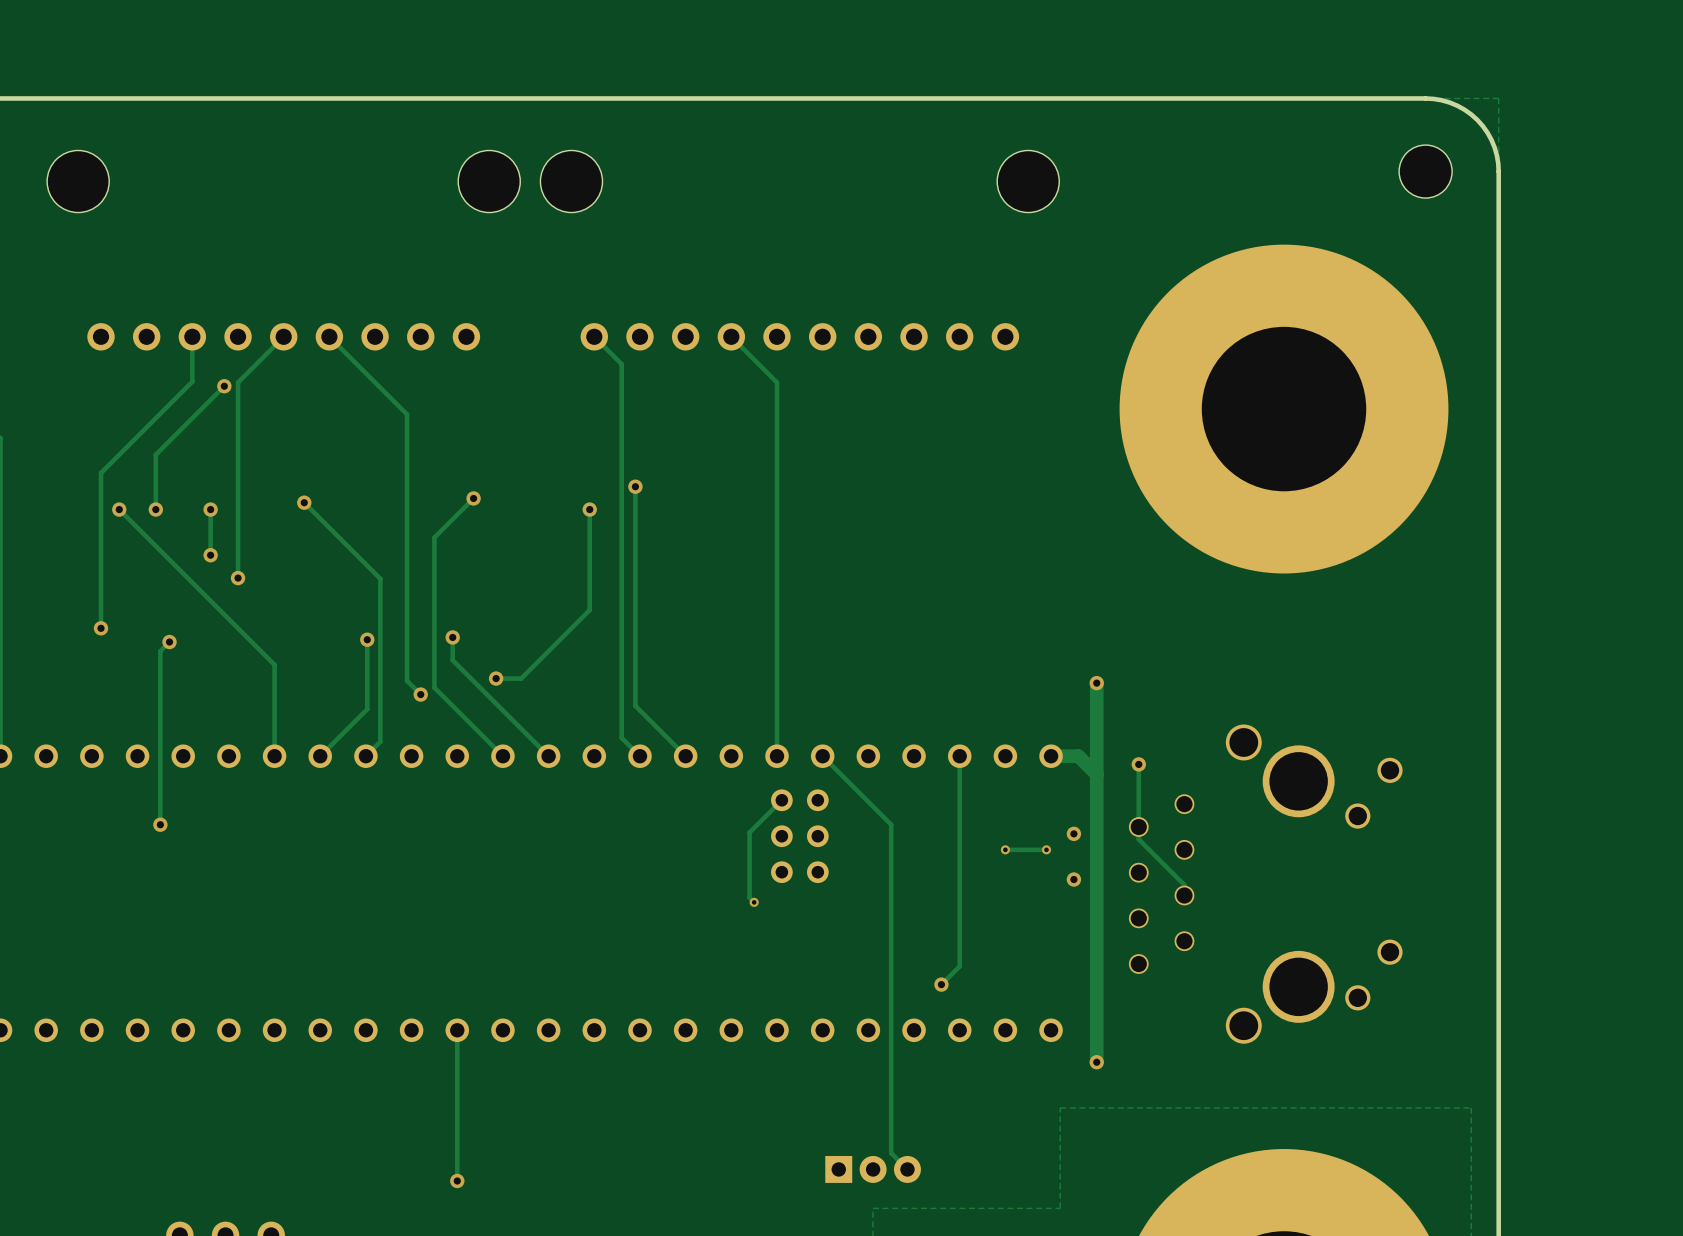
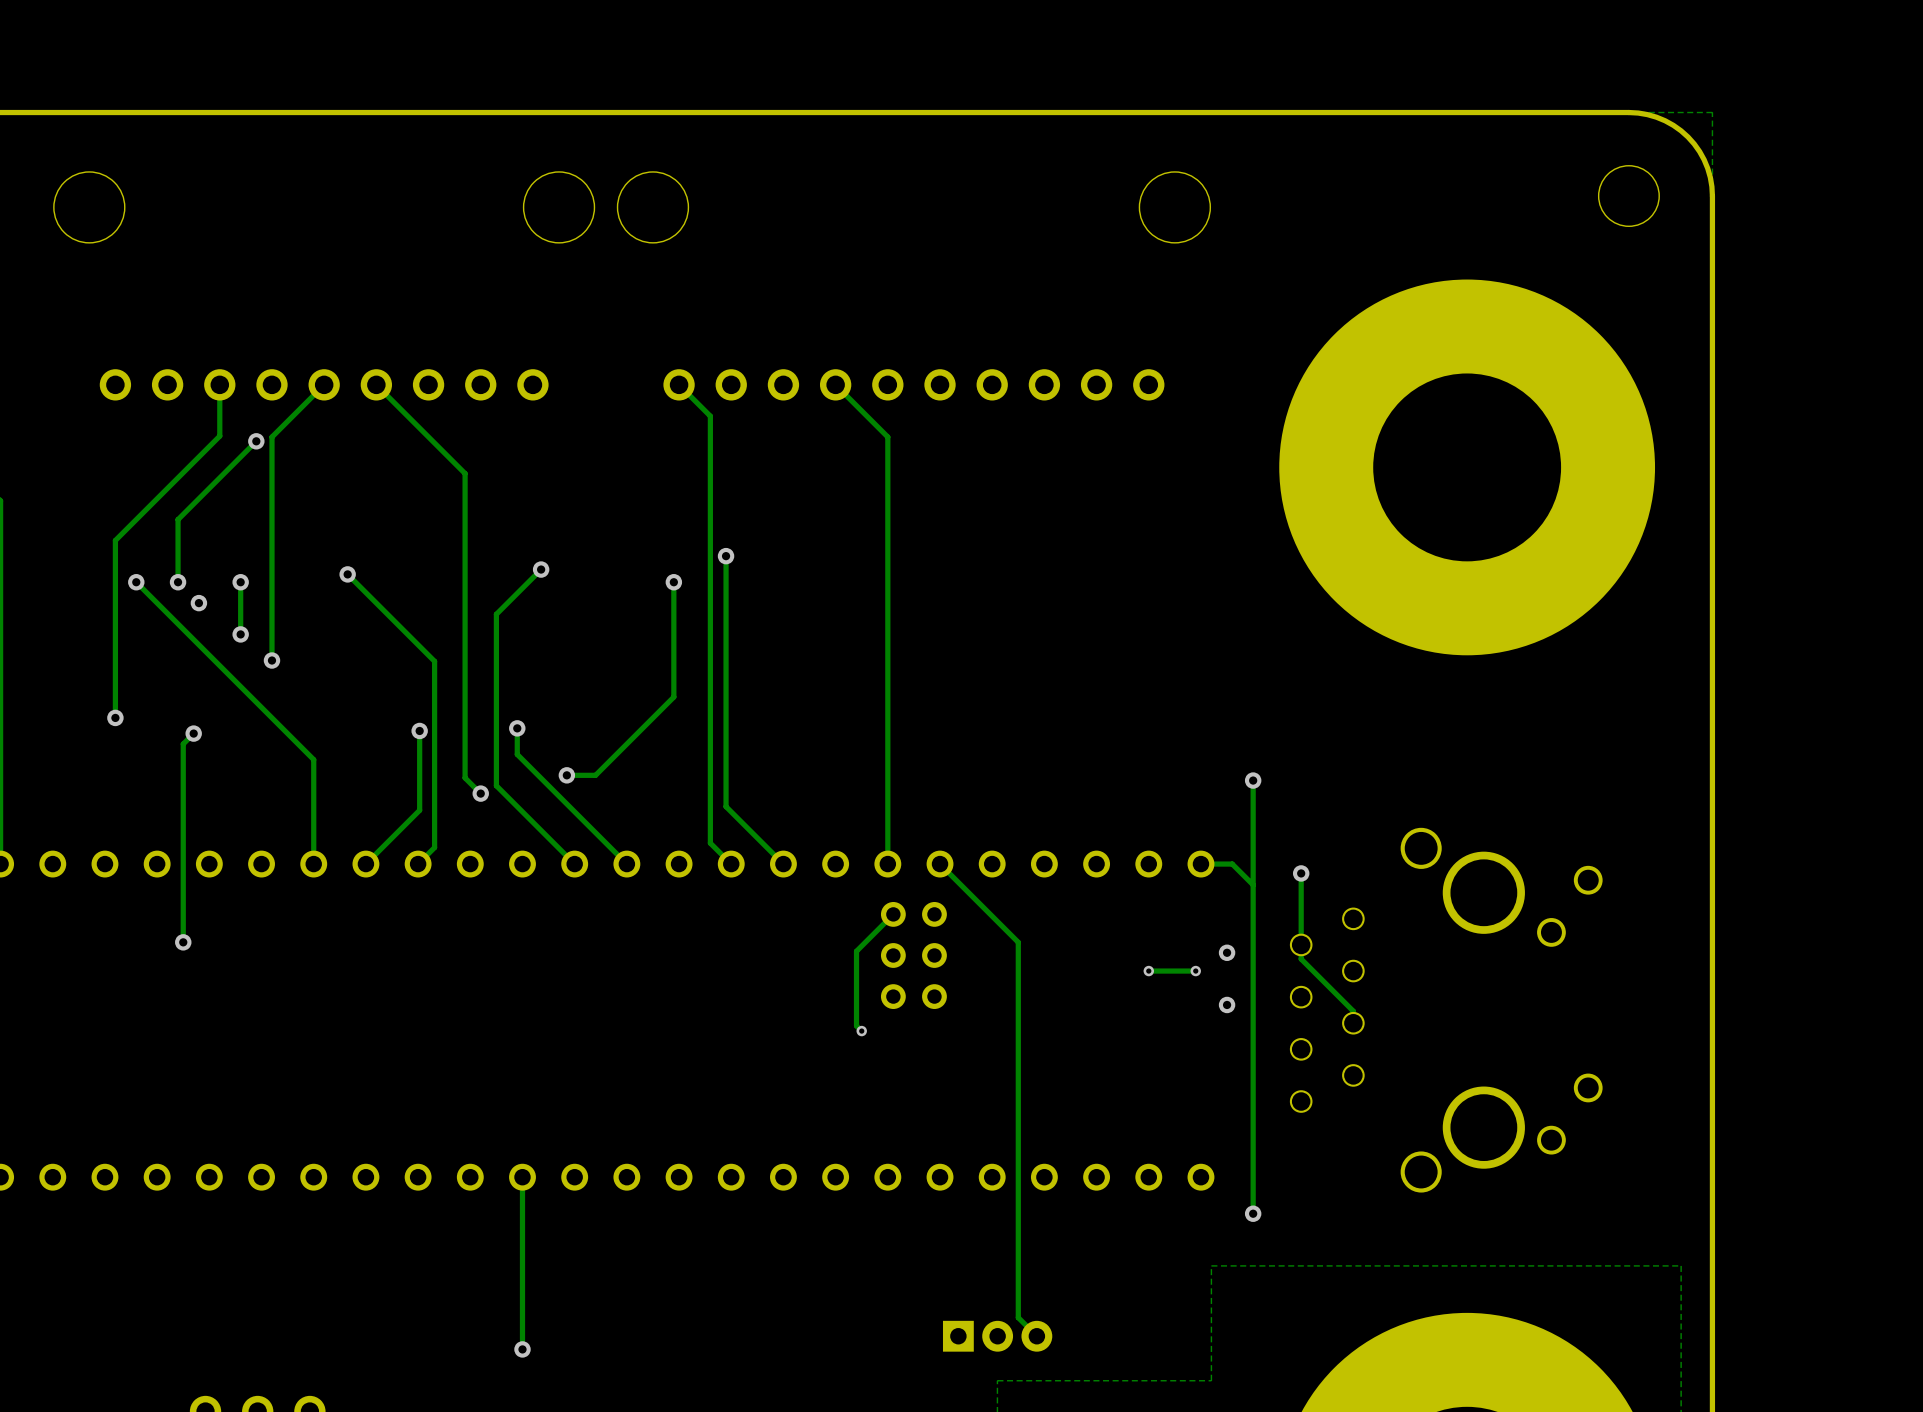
via: none -> (198, 603)
track width: thick (1096, 683) (1096, 1062) -> thin (1253, 780) (1253, 1213)
track: (959, 756) (959, 966) (941, 984) -> none
track width: thick (1051, 756) (1078, 756) (1096, 774) -> thin (1200, 864) (1232, 864) (1253, 884)
via: (941, 984) -> none

